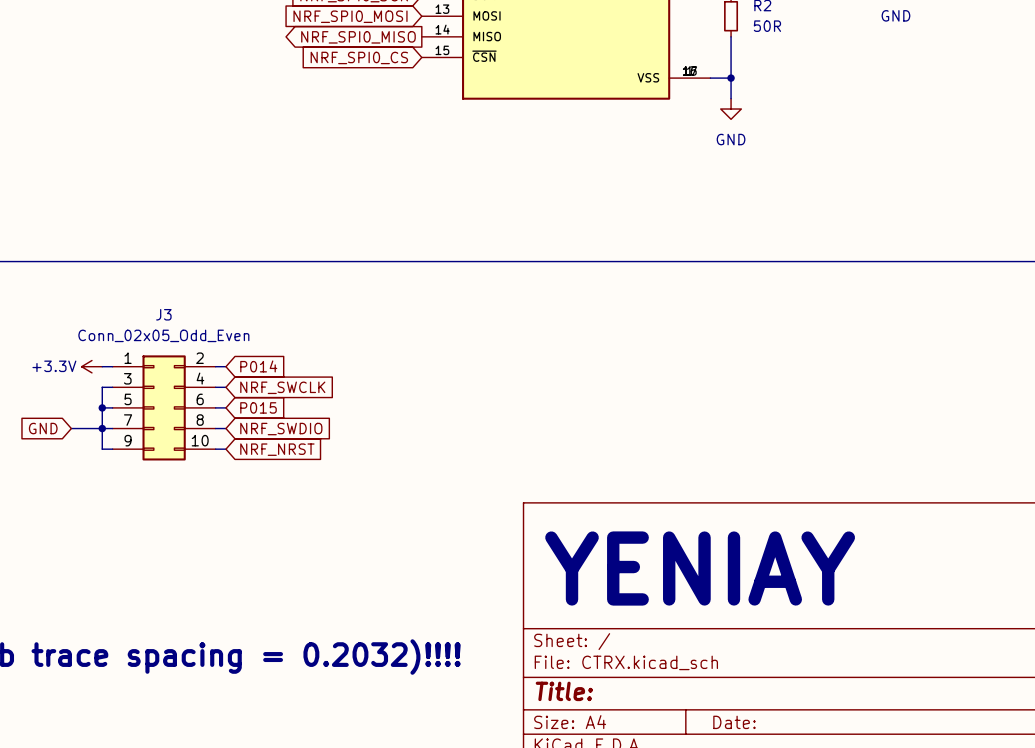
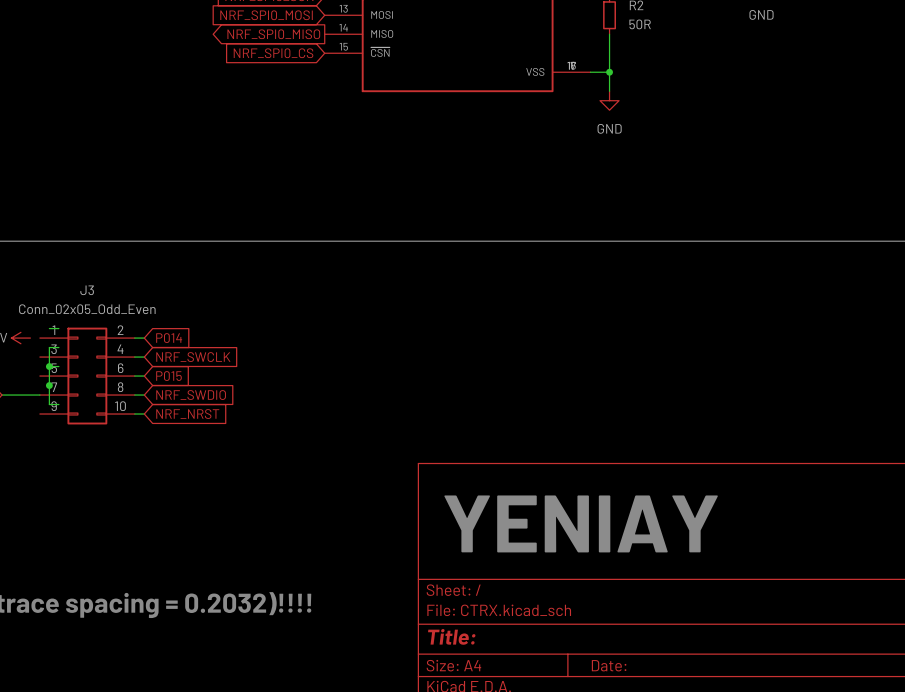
wire: (102, 366) (112, 366) -> (49, 328) (58, 328)
wire: (112, 387) (102, 387) (102, 449) (112, 449) -> (58, 347) (49, 347) (49, 404) (58, 404)
junction: none -> (49, 366)
wire: (102, 407) (112, 407) -> (49, 366) (58, 366)
junction: (102, 407) -> none
junction: none -> (49, 385)
junction: (102, 428) -> none

